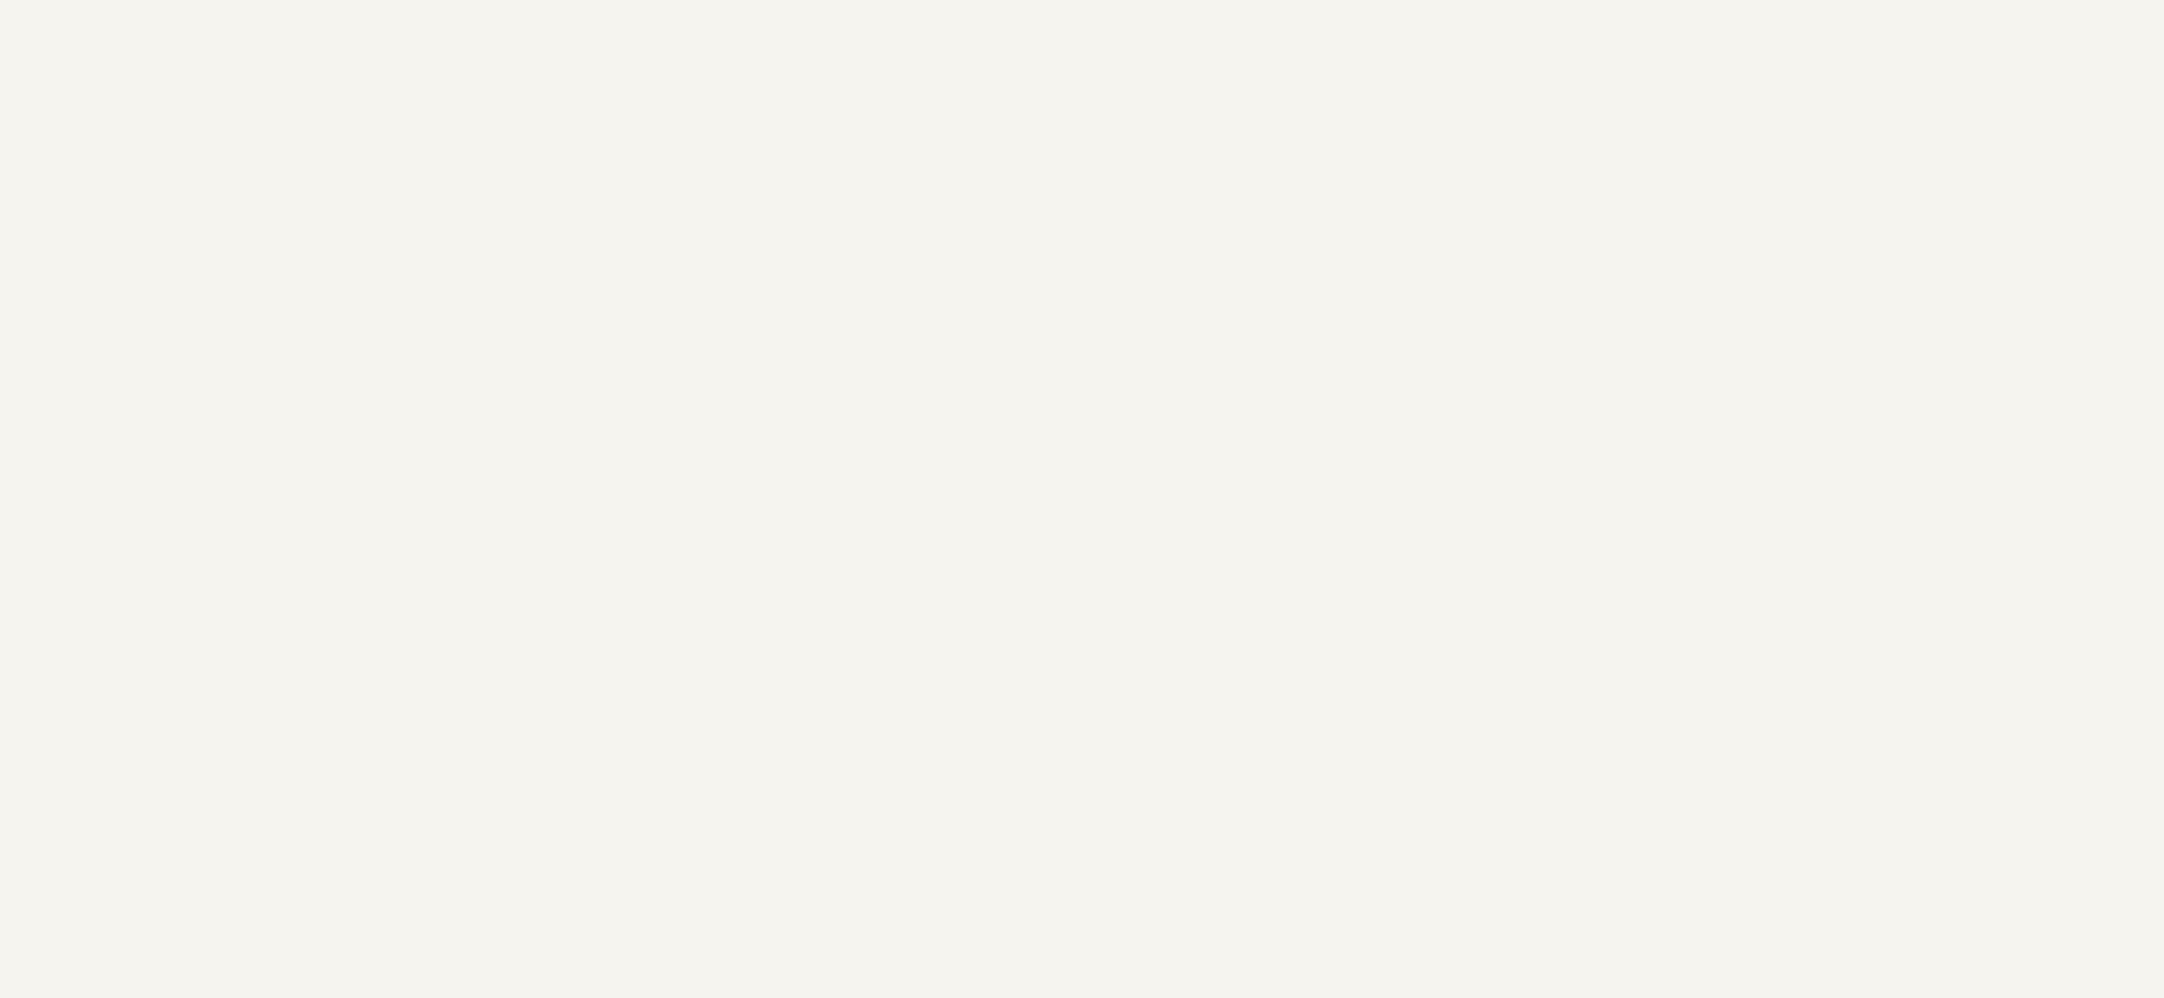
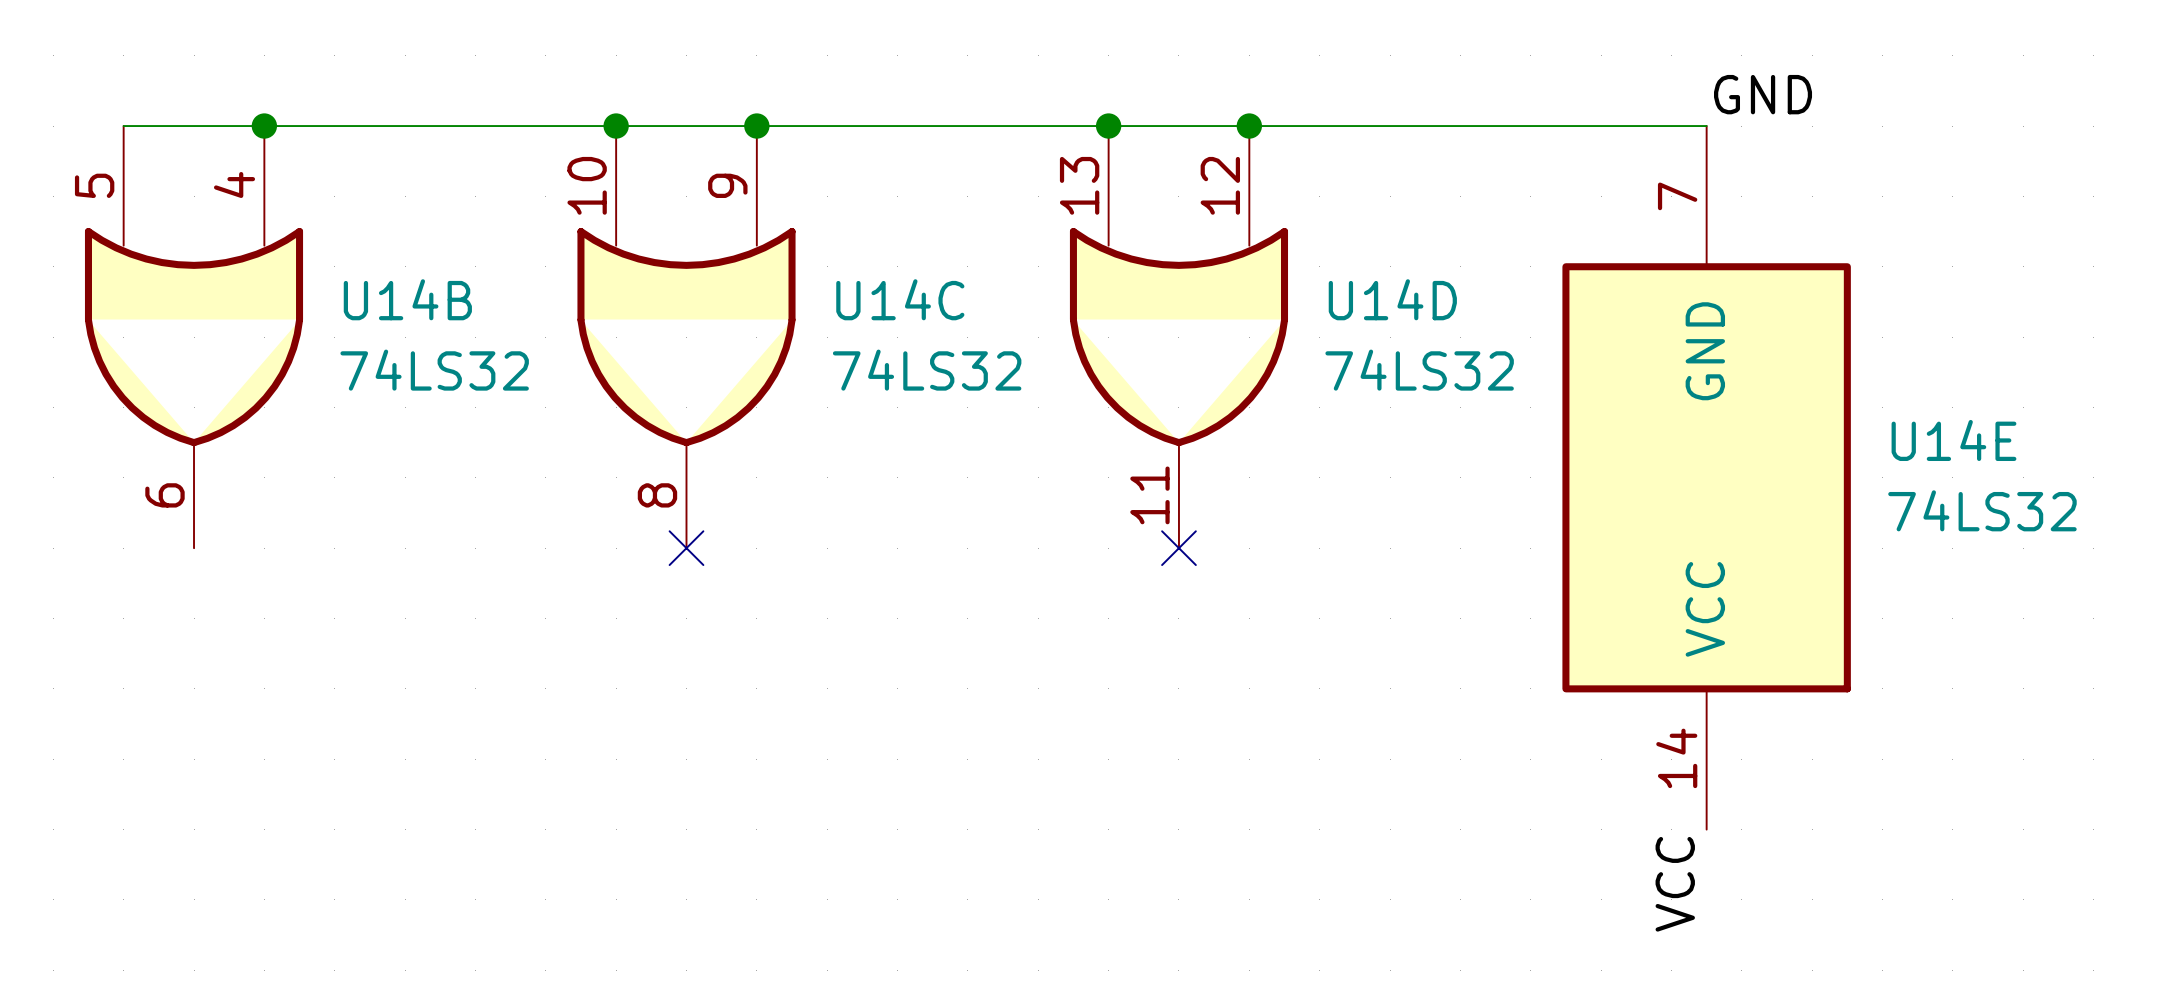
label: none -> GND (1763, 94)
wire: none -> (123, 126) (1706, 126)
junction: none -> (264, 126)
junction: none -> (616, 126)
junction: none -> (756, 126)
junction: none -> (1108, 126)
junction: none -> (1249, 126)
U14B: none -> 74LS32 (194, 337)
U14C: none -> 74LS32 (686, 337)
U14D: none -> 74LS32 (1178, 337)
U14E: none -> 74LS32 (1706, 477)
no-connect mark: none -> (686, 548)
no-connect mark: none -> (1178, 548)
label: none -> VCC (1675, 884)

